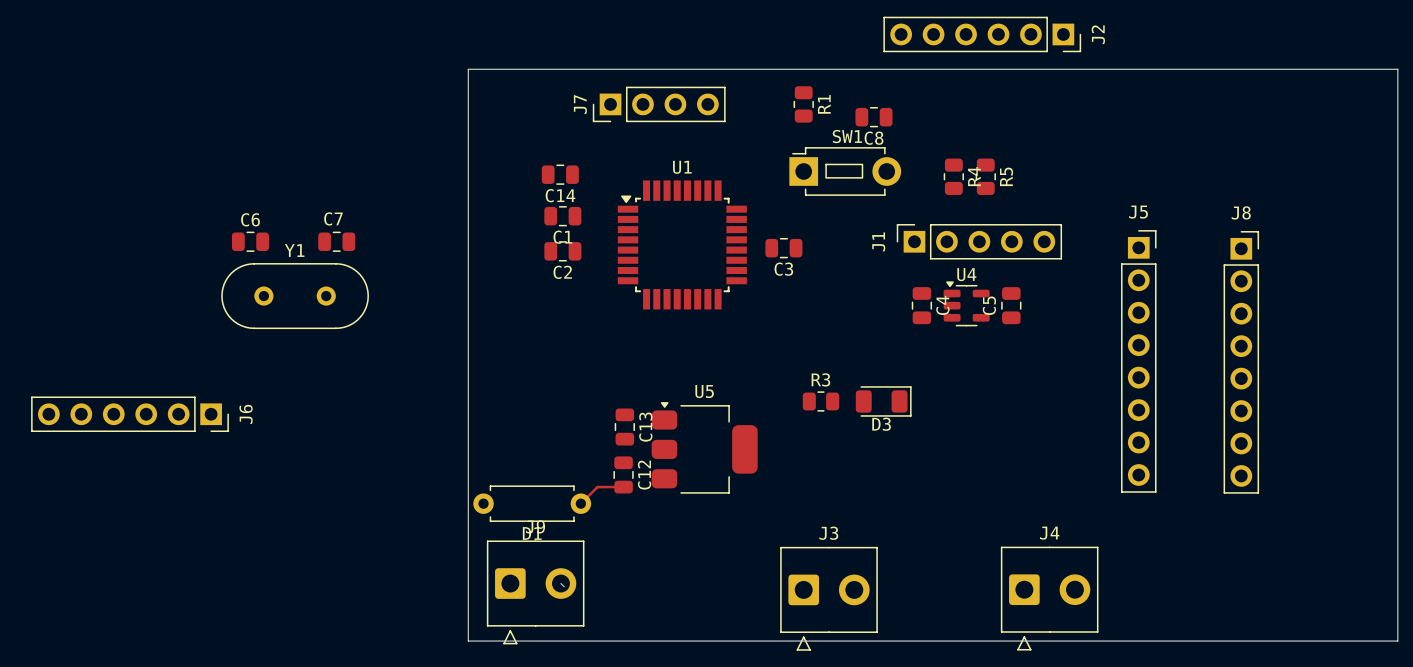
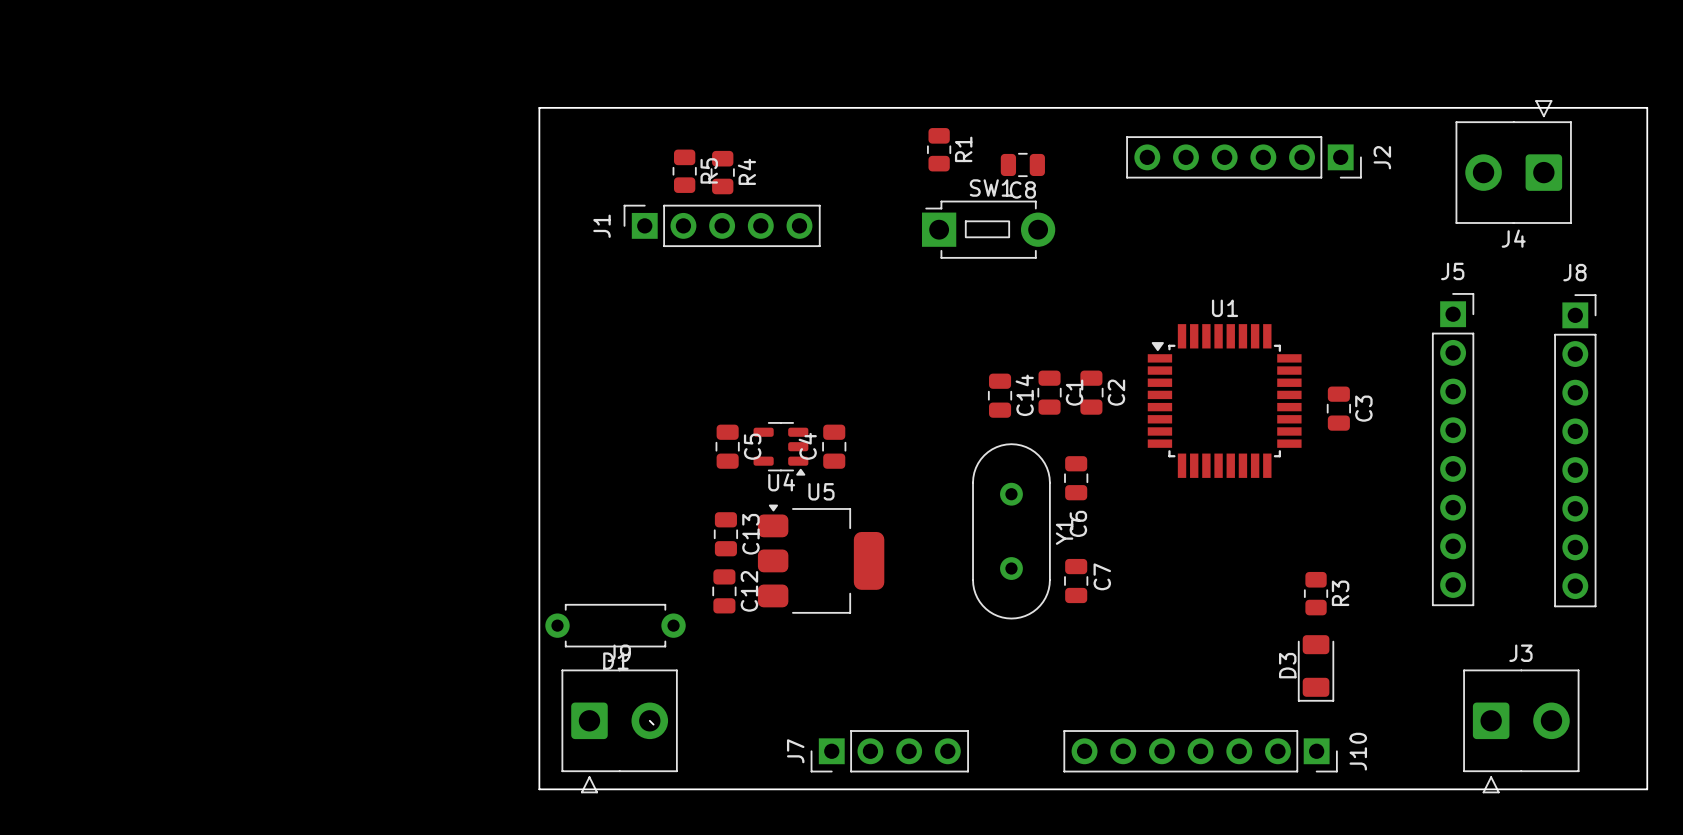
J2 position: (982, 34) -> (1244, 157)
J7 position: (659, 104) -> (889, 751)
C14 rotation: 0° (560, 174) -> 90° clockwise (1000, 395)
C14 position: (560, 174) -> (1000, 395)
R4 position: (953, 176) -> (722, 172)
R5 position: (985, 176) -> (684, 171)
C14 name position: C14 (560, 195) -> C14 (1024, 395)
C1 rotation: 0° (562, 216) -> 90° clockwise (1049, 392)
C1 position: (562, 216) -> (1049, 392)
C6 name position: C6 (250, 219) -> C6 (1078, 523)
C1 name position: C1 (562, 237) -> C1 (1074, 392)
C6 rotation: 0° (250, 241) -> 90° clockwise (1076, 478)
C6 position: (250, 241) -> (1076, 478)
C7 rotation: 0° (336, 241) -> 90° clockwise (1076, 581)
C7 position: (336, 241) -> (1076, 581)
J1 position: (979, 241) -> (722, 225)
U1 position: (682, 244) -> (1224, 401)
C3 rotation: 0° (783, 248) -> 90° clockwise (1338, 408)
C3 position: (783, 248) -> (1338, 408)
C2 rotation: 0° (562, 251) -> 90° clockwise (1091, 392)
C2 position: (562, 251) -> (1091, 392)
C3 name position: C3 (783, 269) -> C3 (1363, 408)
C2 name position: C2 (562, 272) -> C2 (1116, 392)
Y1 rotation: 0° (295, 296) -> 90° clockwise (1011, 531)
Y1 position: (295, 296) -> (1011, 531)
U4 rotation: 0° (966, 303) -> 180° (780, 448)
U4 position: (966, 303) -> (780, 448)
C4 position: (921, 305) -> (834, 446)
C4 name position: C4 (942, 305) -> C4 (807, 446)
C5 name position: C5 (989, 305) -> C5 (752, 446)
C5 position: (1011, 305) -> (727, 446)
J5 position: (1138, 361) -> (1453, 449)
J8 position: (1241, 362) -> (1575, 450)
R3 rotation: 0° (820, 401) -> 90° clockwise (1316, 593)
R3 position: (820, 401) -> (1316, 593)
D3 rotation: 0° (883, 401) -> 90° clockwise (1316, 668)
D3 position: (883, 401) -> (1316, 668)
J6: (130, 414) -> none
top track: (623, 487) (597, 487) (580, 503) -> none
J3 position: (829, 598) -> (1521, 731)
J4 rotation: 0° (1049, 598) -> 180° (1513, 162)
J4 position: (1049, 598) -> (1513, 162)
J10: none -> (1200, 751)

